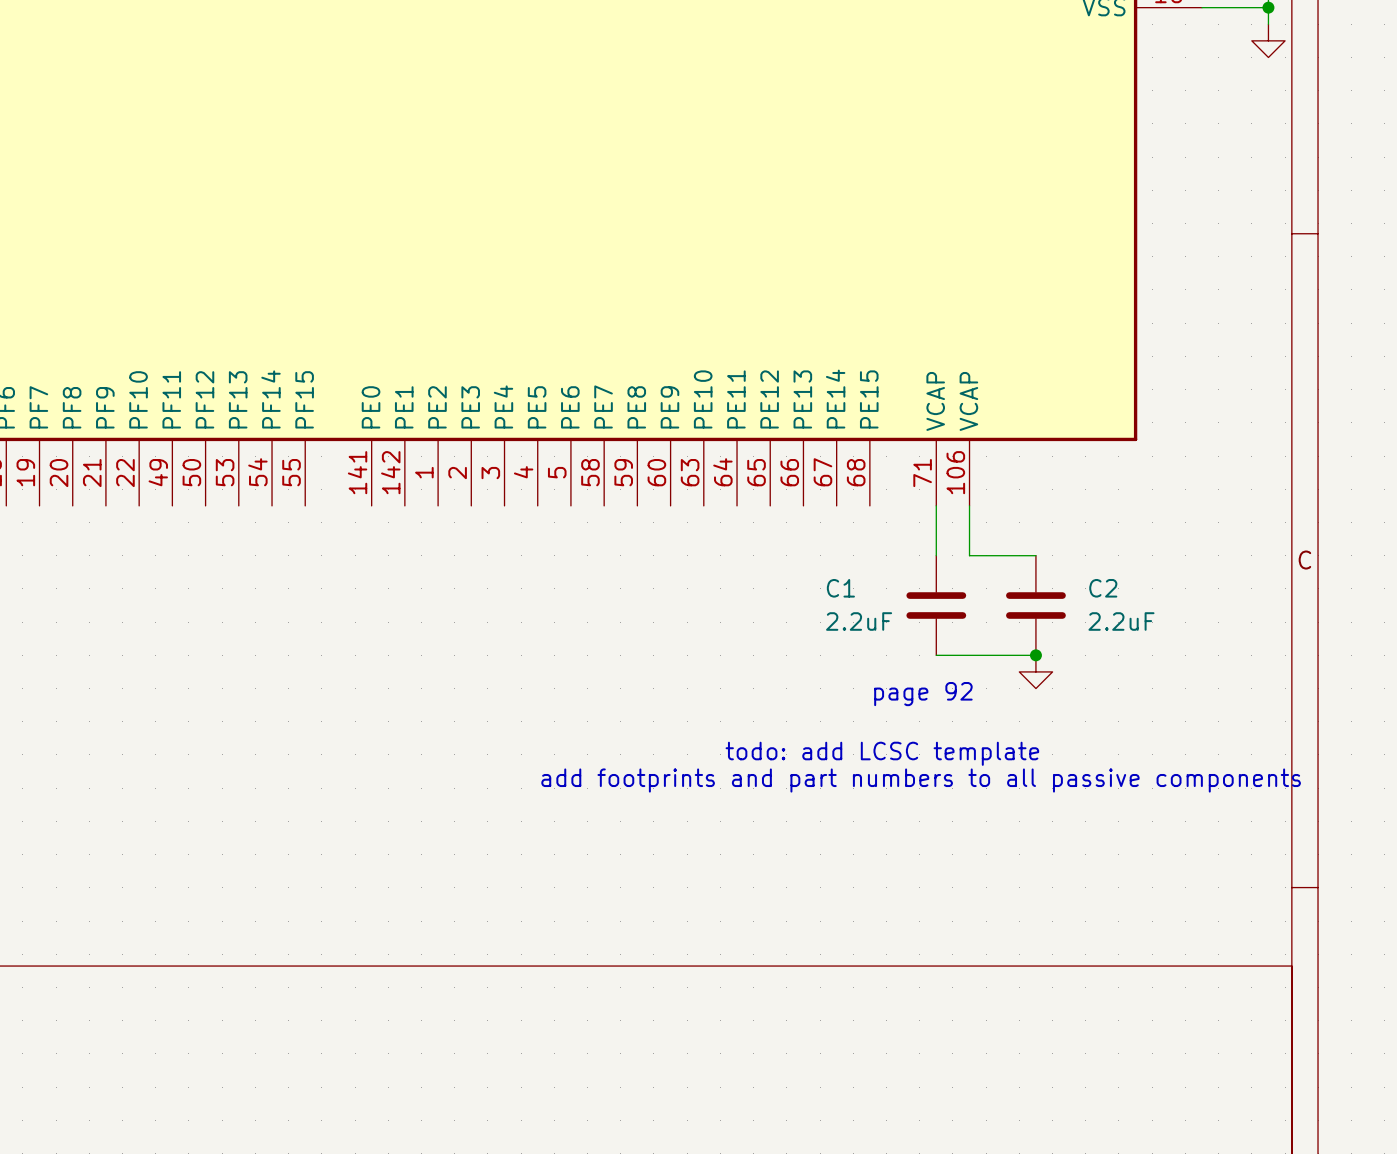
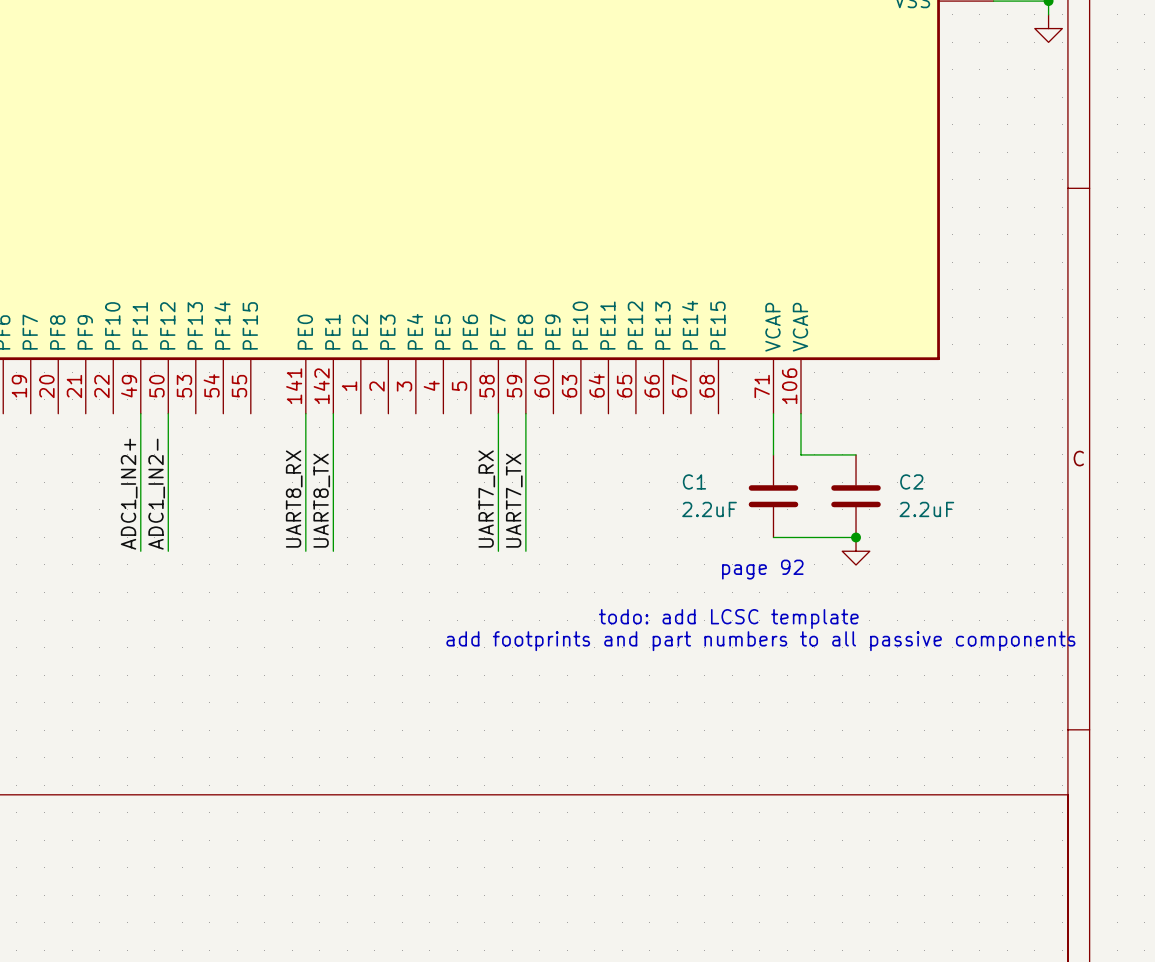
wire: none -> (140, 413) (140, 551)
wire: none -> (168, 413) (168, 551)
wire: none -> (305, 413) (305, 551)
wire: none -> (333, 413) (333, 551)
wire: none -> (498, 413) (498, 551)
wire: none -> (525, 413) (525, 551)
label: none -> ADC1_IN2+ (129, 494)
label: none -> ADC1_IN2- (156, 494)
label: none -> UART8_RX (294, 499)
label: none -> UART7_RX (486, 499)
label: none -> UART8_TX (321, 500)
label: none -> UART7_TX (514, 500)

